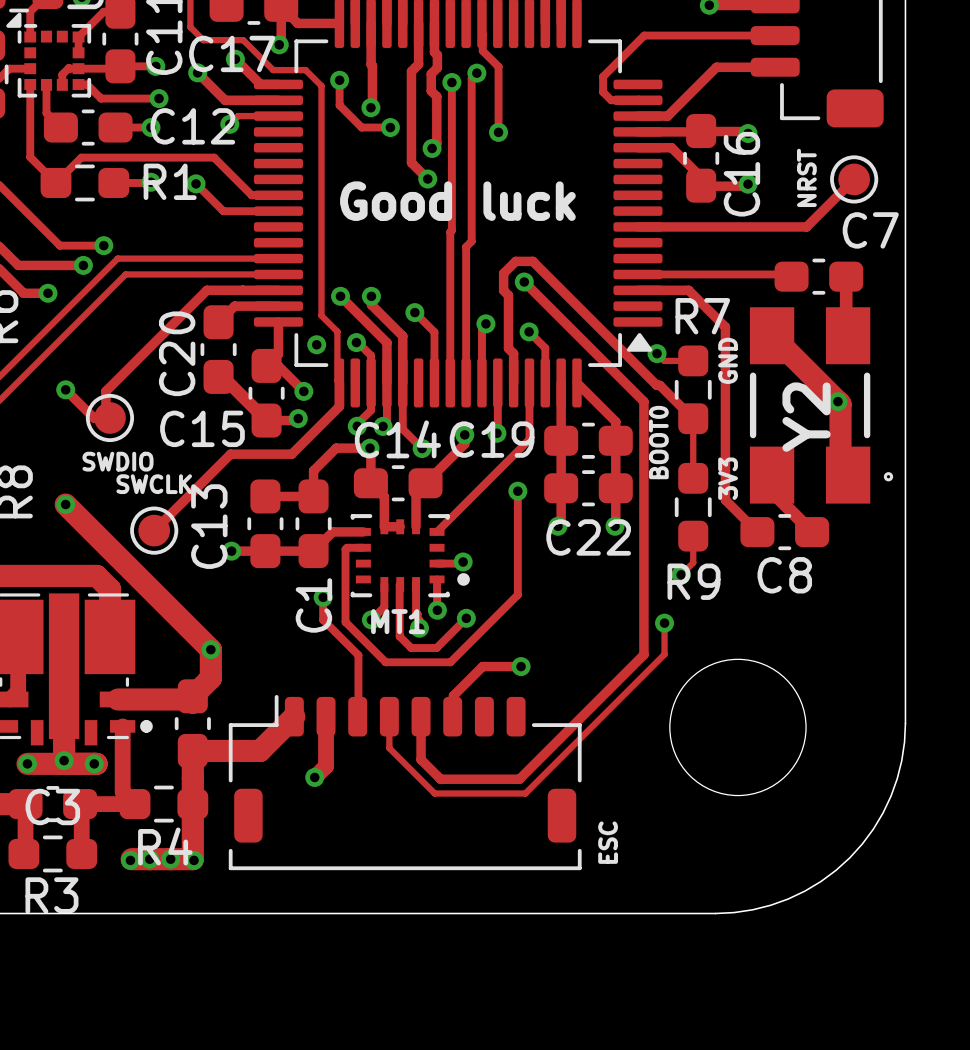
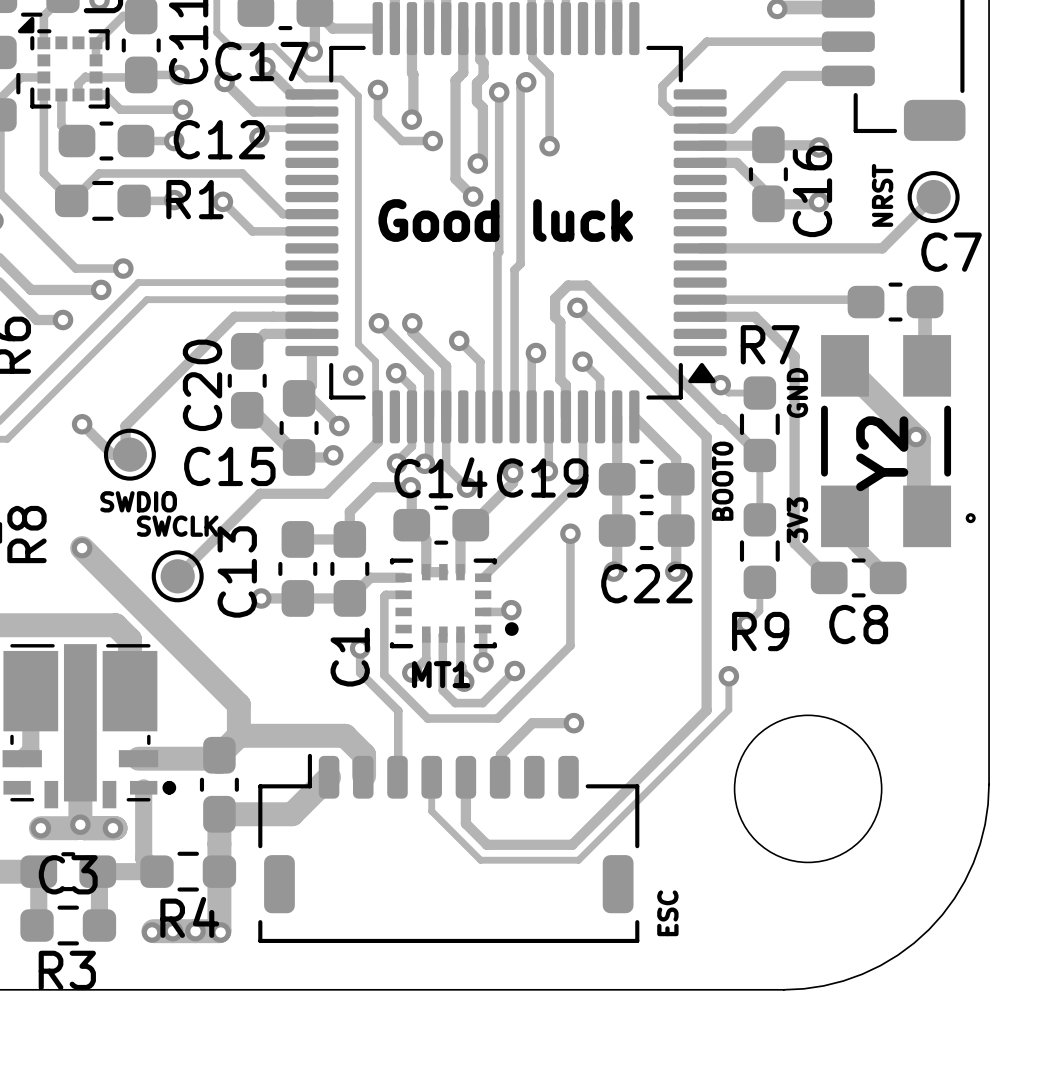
via: (210, 649) -> none
track: none -> (238, 735) (345, 735) (364, 754) (364, 776)
track: (326, 716) (326, 766) (314, 777) -> none
via: (314, 777) -> none

